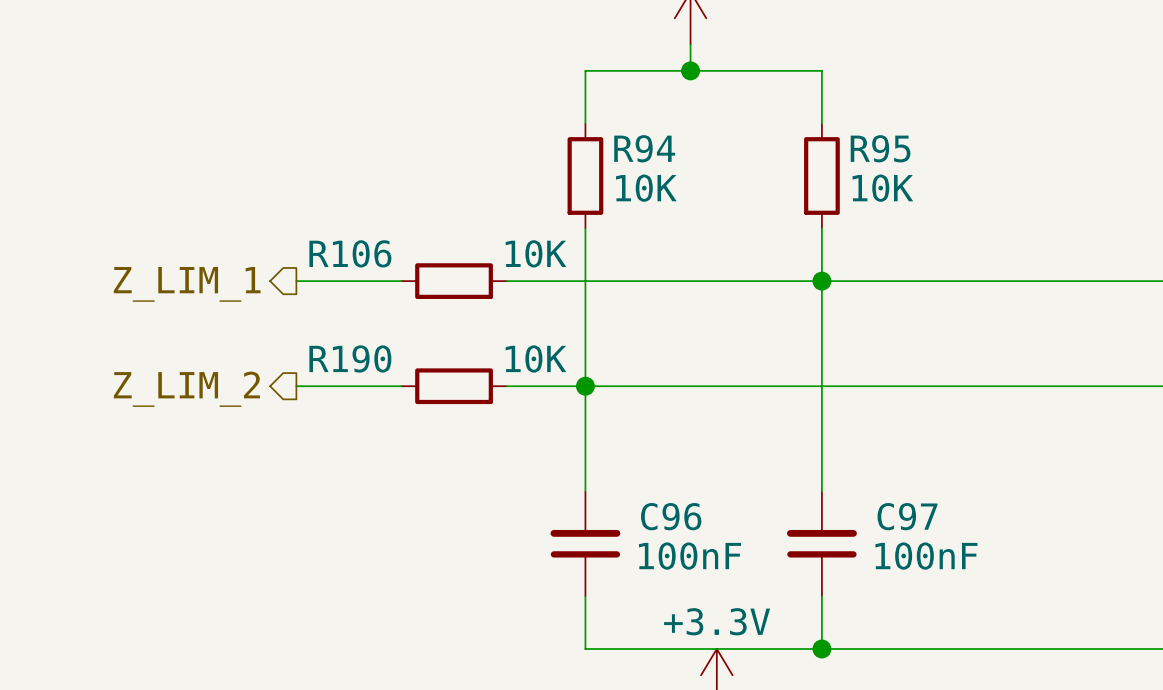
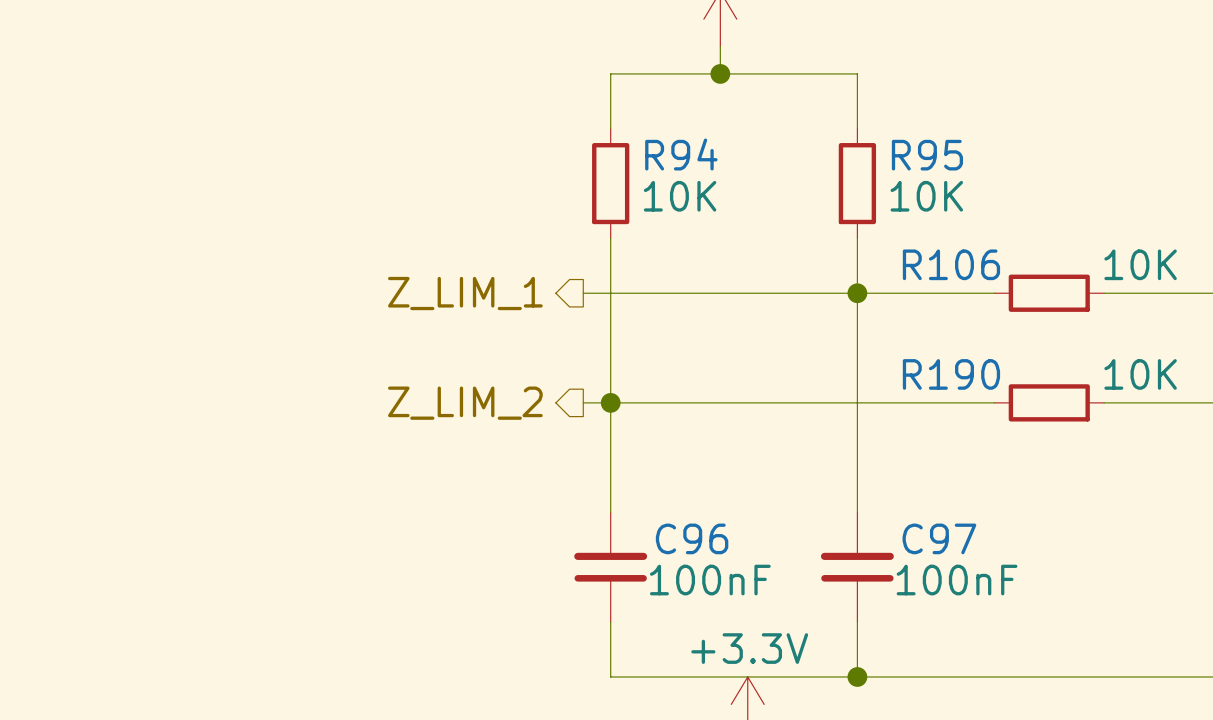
wire: (296, 281) (401, 281) -> none
R106 position: (454, 281) -> (1049, 293)
wire: (506, 281) (559, 281) -> none
wire: (953, 281) (1058, 281) -> none
hierarchical label position: Z_LIM_1 (187, 284) -> Z_LIM_1 (465, 293)
wire: (296, 386) (401, 386) -> none
R190 position: (454, 386) -> (1049, 402)
wire: (506, 386) (559, 386) -> none
wire: (953, 386) (1058, 386) -> none
hierarchical label position: Z_LIM_2 (186, 389) -> Z_LIM_2 (465, 403)

